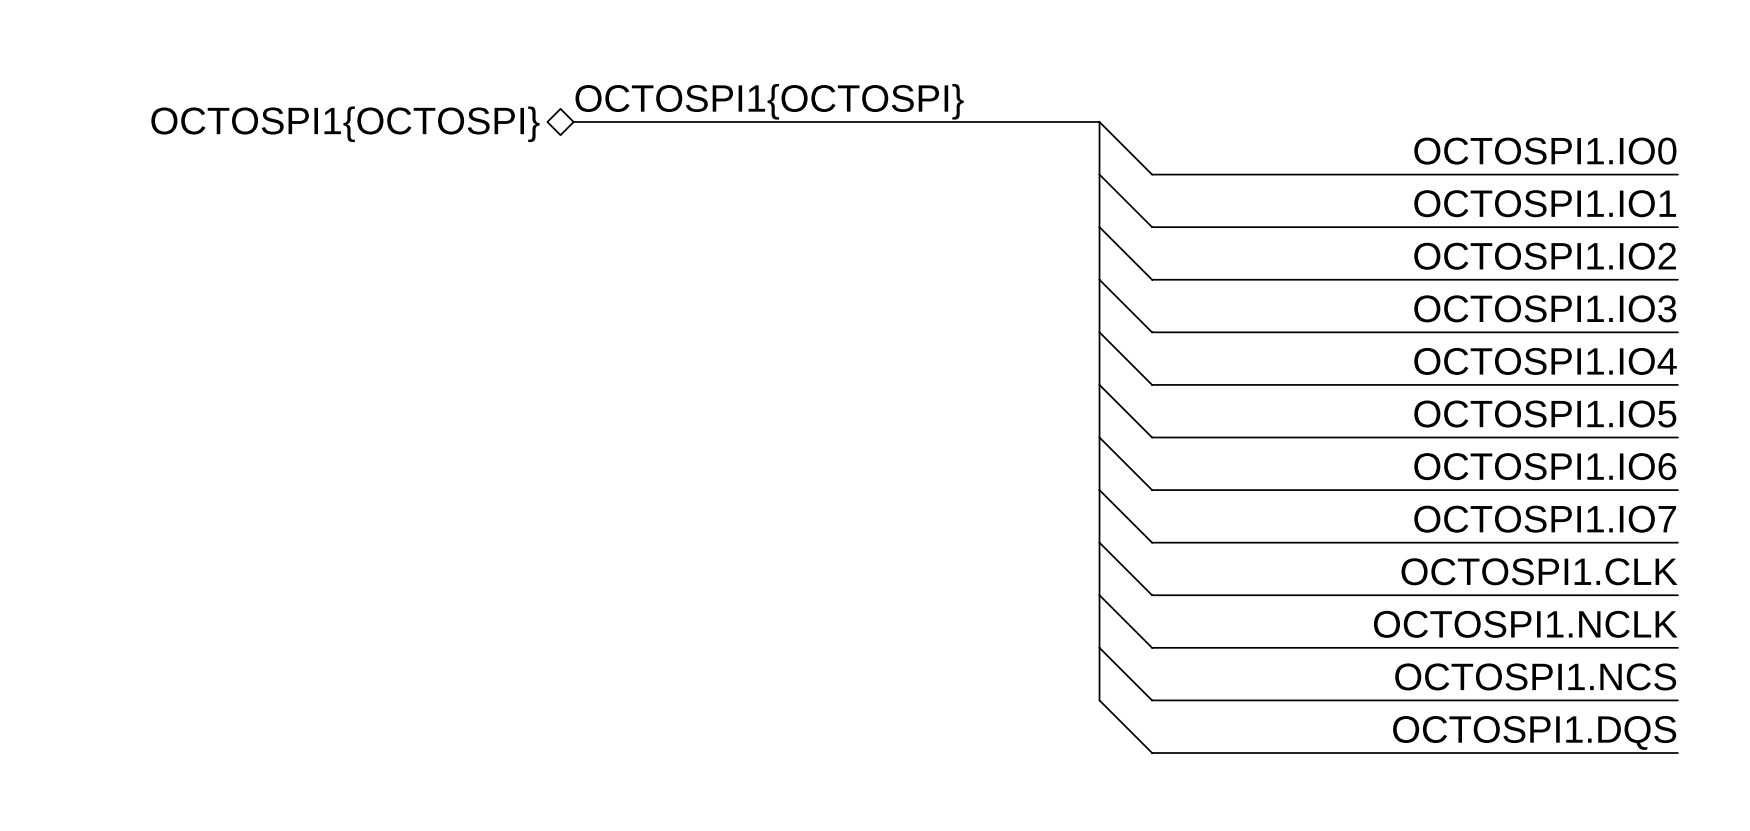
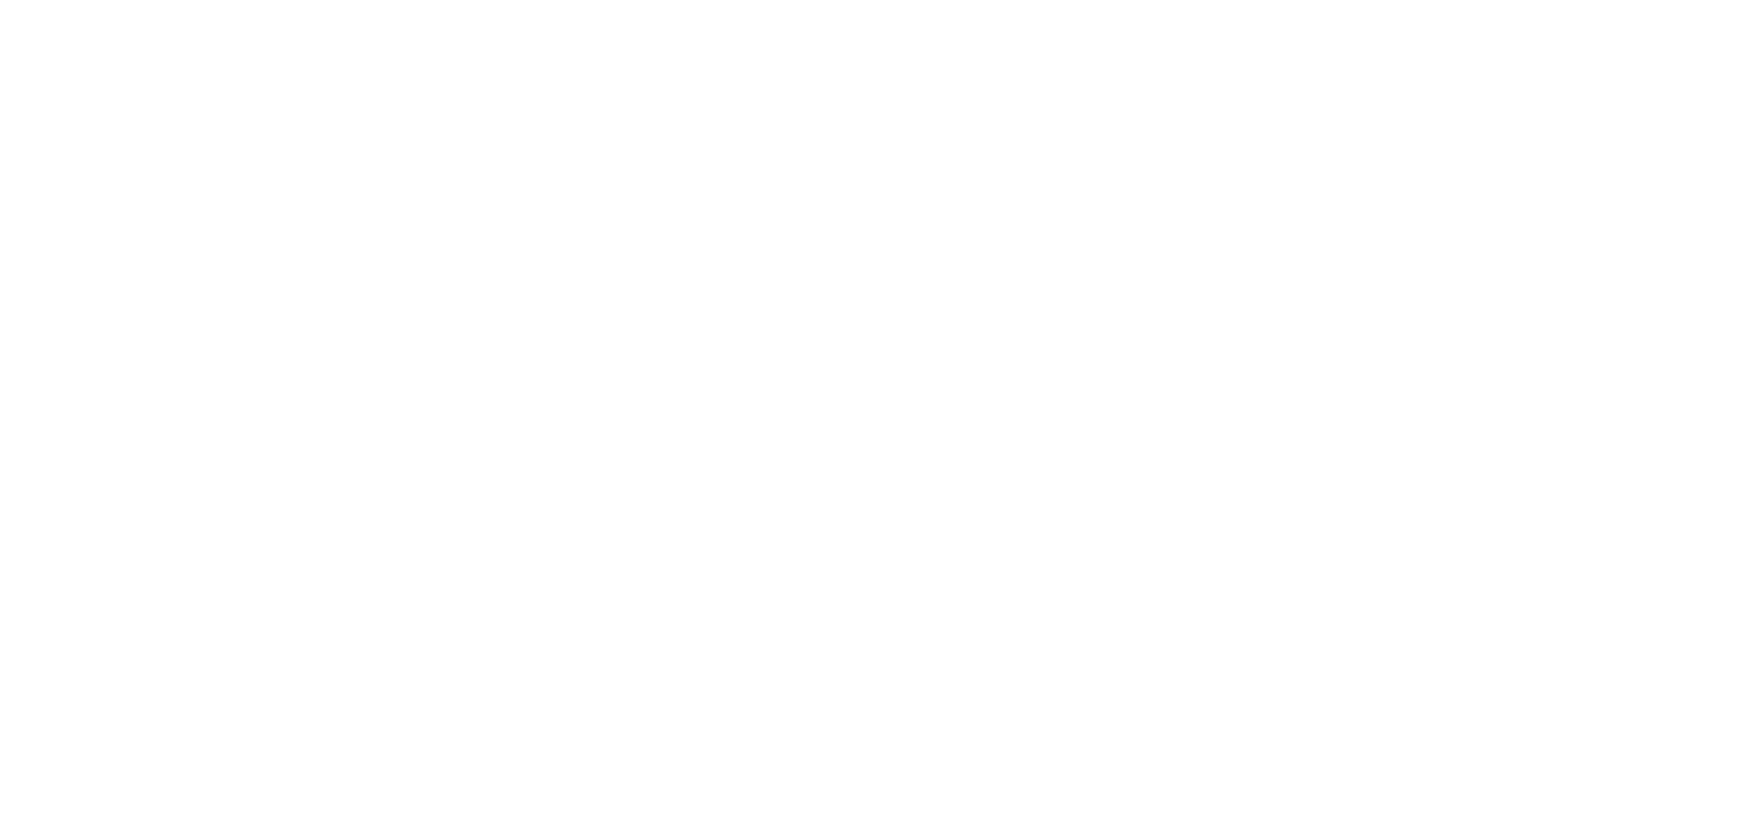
label: OCTOSPI1{OCTOSPI} (769, 101) -> none
bus: (573, 122) (1099, 122) (1099, 700) -> none
wire: (1099, 122) (1152, 174) (1677, 174) -> none
hierarchical label: OCTOSPI1{OCTOSPI} (345, 124) -> none
label: OCTOSPI1.IO0 (1545, 151) -> none
wire: (1099, 174) (1152, 227) (1677, 227) -> none
label: OCTOSPI1.IO1 (1545, 203) -> none
wire: (1099, 227) (1152, 279) (1677, 279) -> none
label: OCTOSPI1.IO2 (1545, 256) -> none
wire: (1099, 279) (1152, 332) (1677, 332) -> none
label: OCTOSPI1.IO3 (1545, 308) -> none
wire: (1099, 332) (1152, 384) (1677, 384) -> none
label: OCTOSPI1.IO4 (1545, 361) -> none
wire: (1099, 384) (1152, 437) (1677, 437) -> none
label: OCTOSPI1.IO5 (1545, 414) -> none
wire: (1099, 437) (1152, 490) (1677, 490) -> none
label: OCTOSPI1.IO6 (1545, 466) -> none
wire: (1099, 490) (1152, 542) (1677, 542) -> none
label: OCTOSPI1.IO7 (1545, 519) -> none
wire: (1099, 542) (1152, 595) (1677, 595) -> none
label: OCTOSPI1.CLK (1539, 571) -> none
wire: (1099, 595) (1152, 647) (1677, 647) -> none
label: OCTOSPI1.NCLK (1525, 624) -> none
wire: (1099, 647) (1152, 700) (1677, 700) -> none
label: OCTOSPI1.NCS (1535, 676) -> none
wire: (1099, 700) (1152, 752) (1677, 752) -> none
label: OCTOSPI1.DQS (1534, 732) -> none

